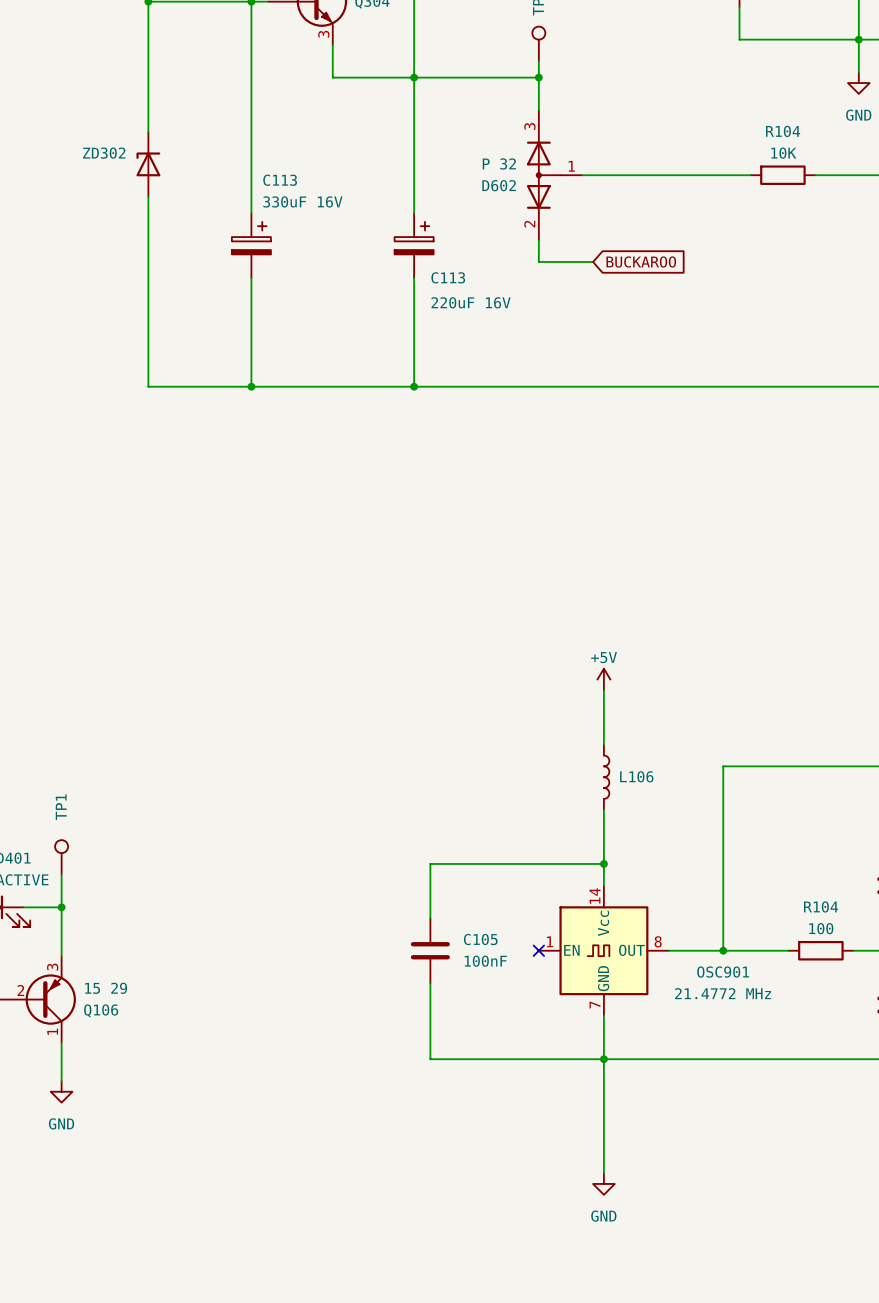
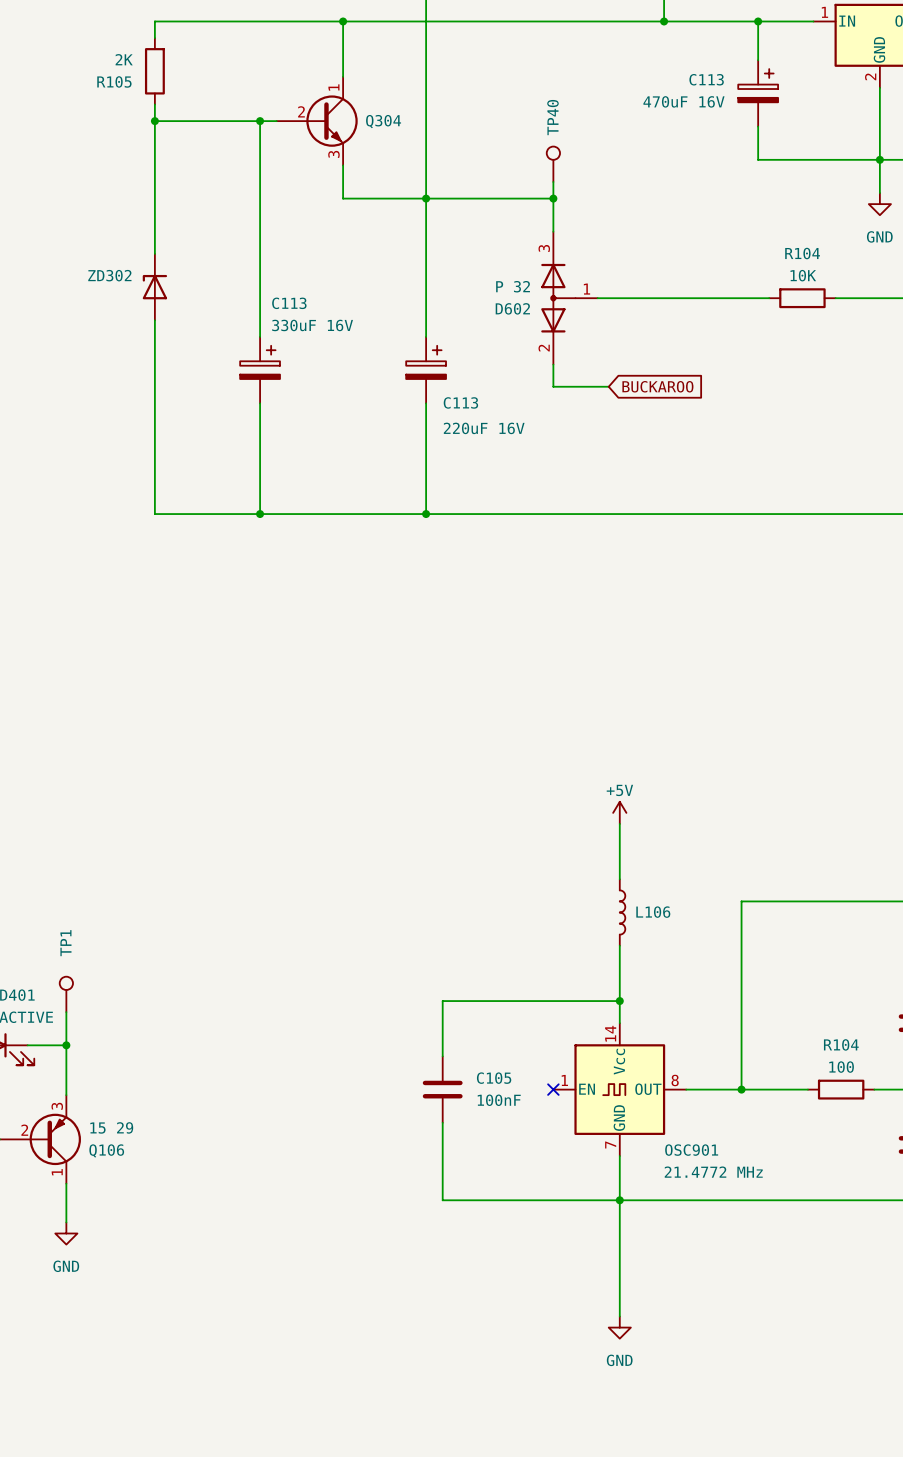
OSC901 name position: OSC901 (723, 972) -> OSC901 (691, 1150)
OSC901 value position: 21.4772 MHz (723, 993) -> 21.4772 MHz (713, 1172)

